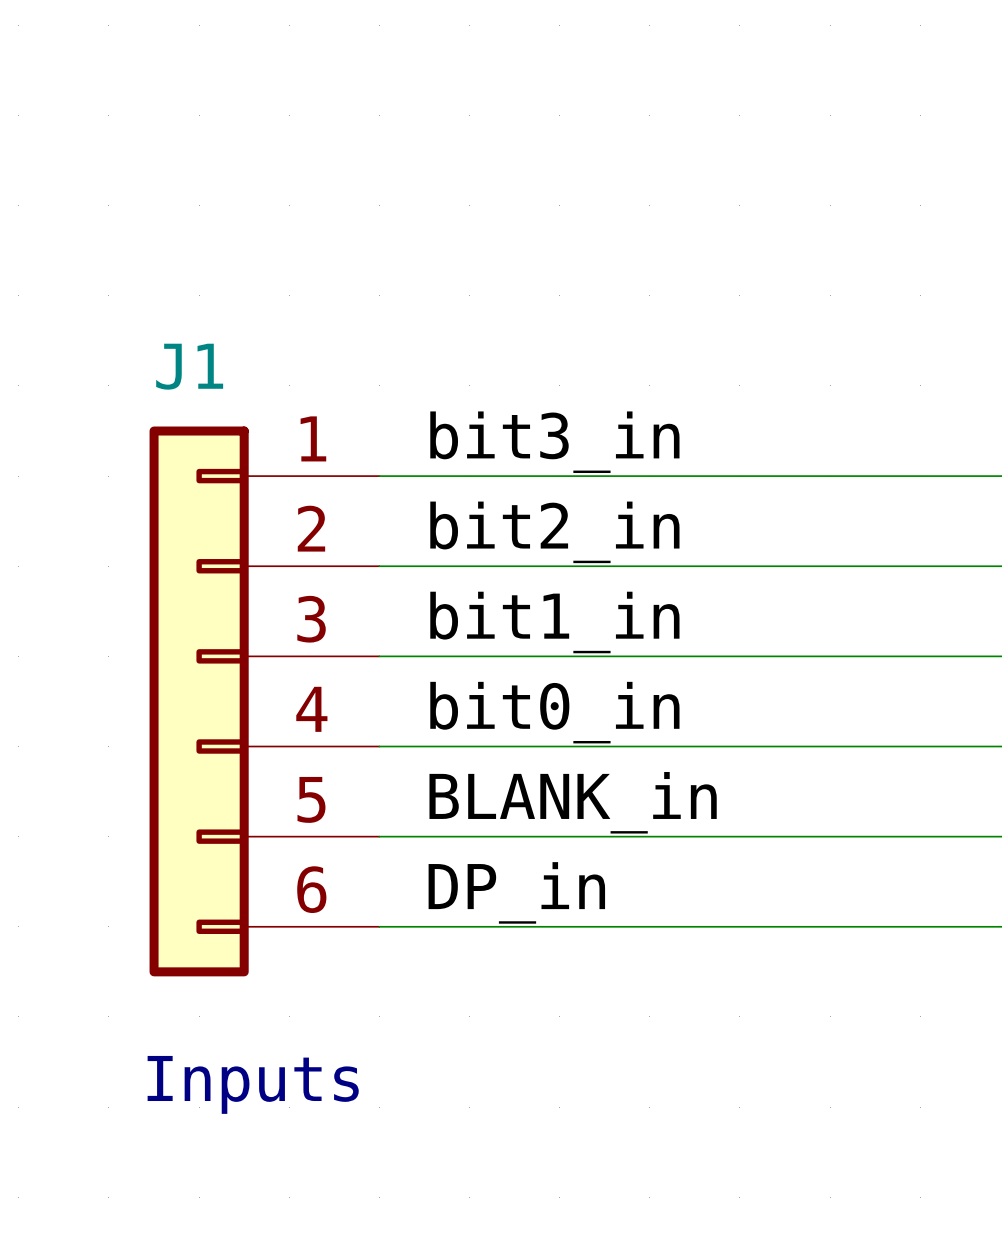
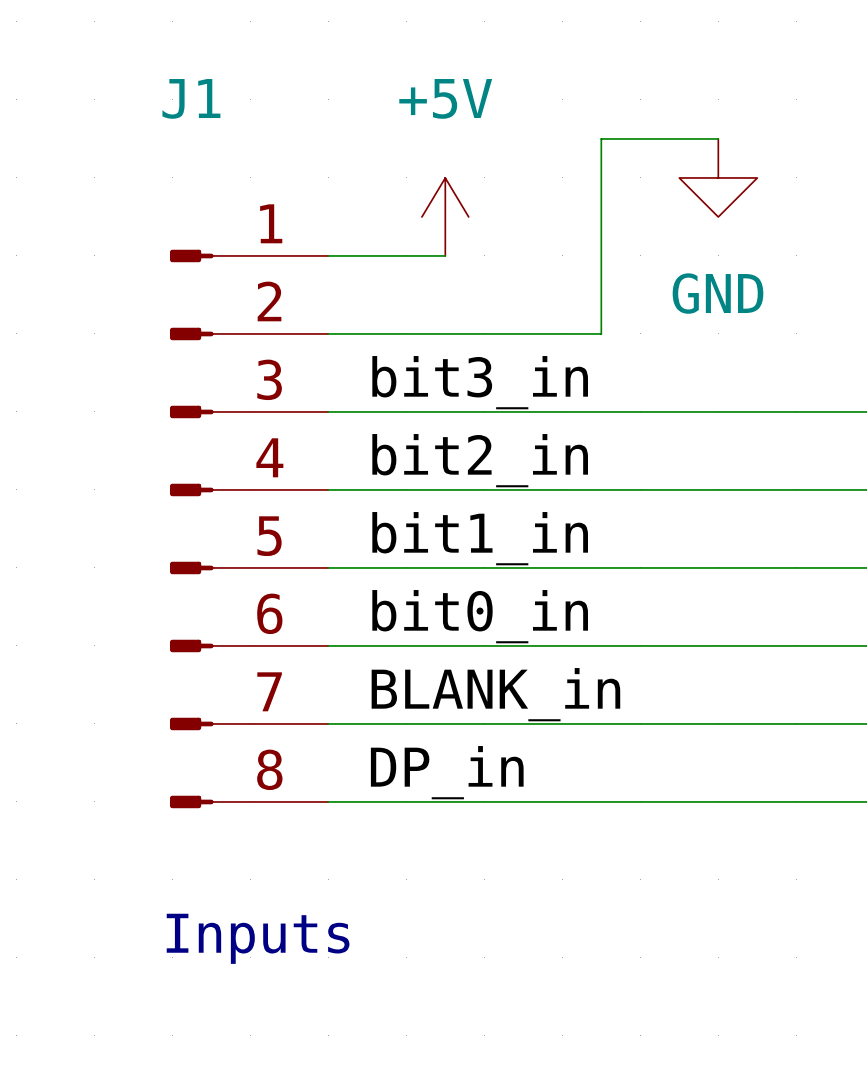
wire: none -> (718, 138) (601, 138) (601, 333) (328, 333)
power symbol: none -> GND (718, 177)
power symbol: none -> +5V (445, 216)
wire: none -> (328, 255) (445, 255)
J1 name position: J1 (189, 366) -> J1 (191, 98)
J1 symbol: [149, 426, 380, 977] -> [169, 249, 329, 809]
text position: Inputs (253, 1084) -> Inputs (258, 938)

